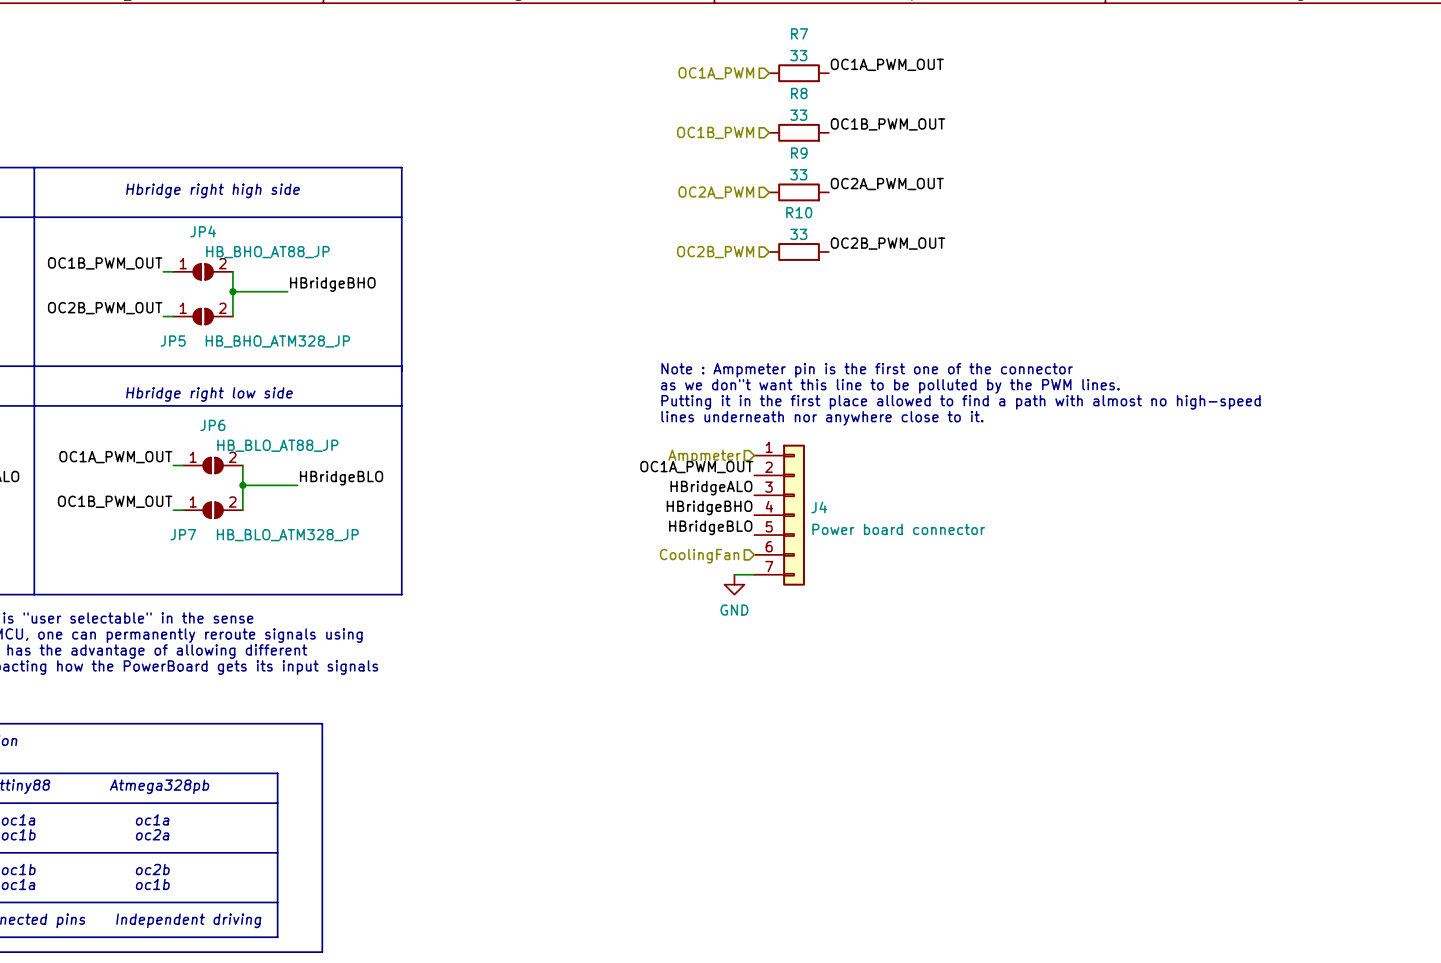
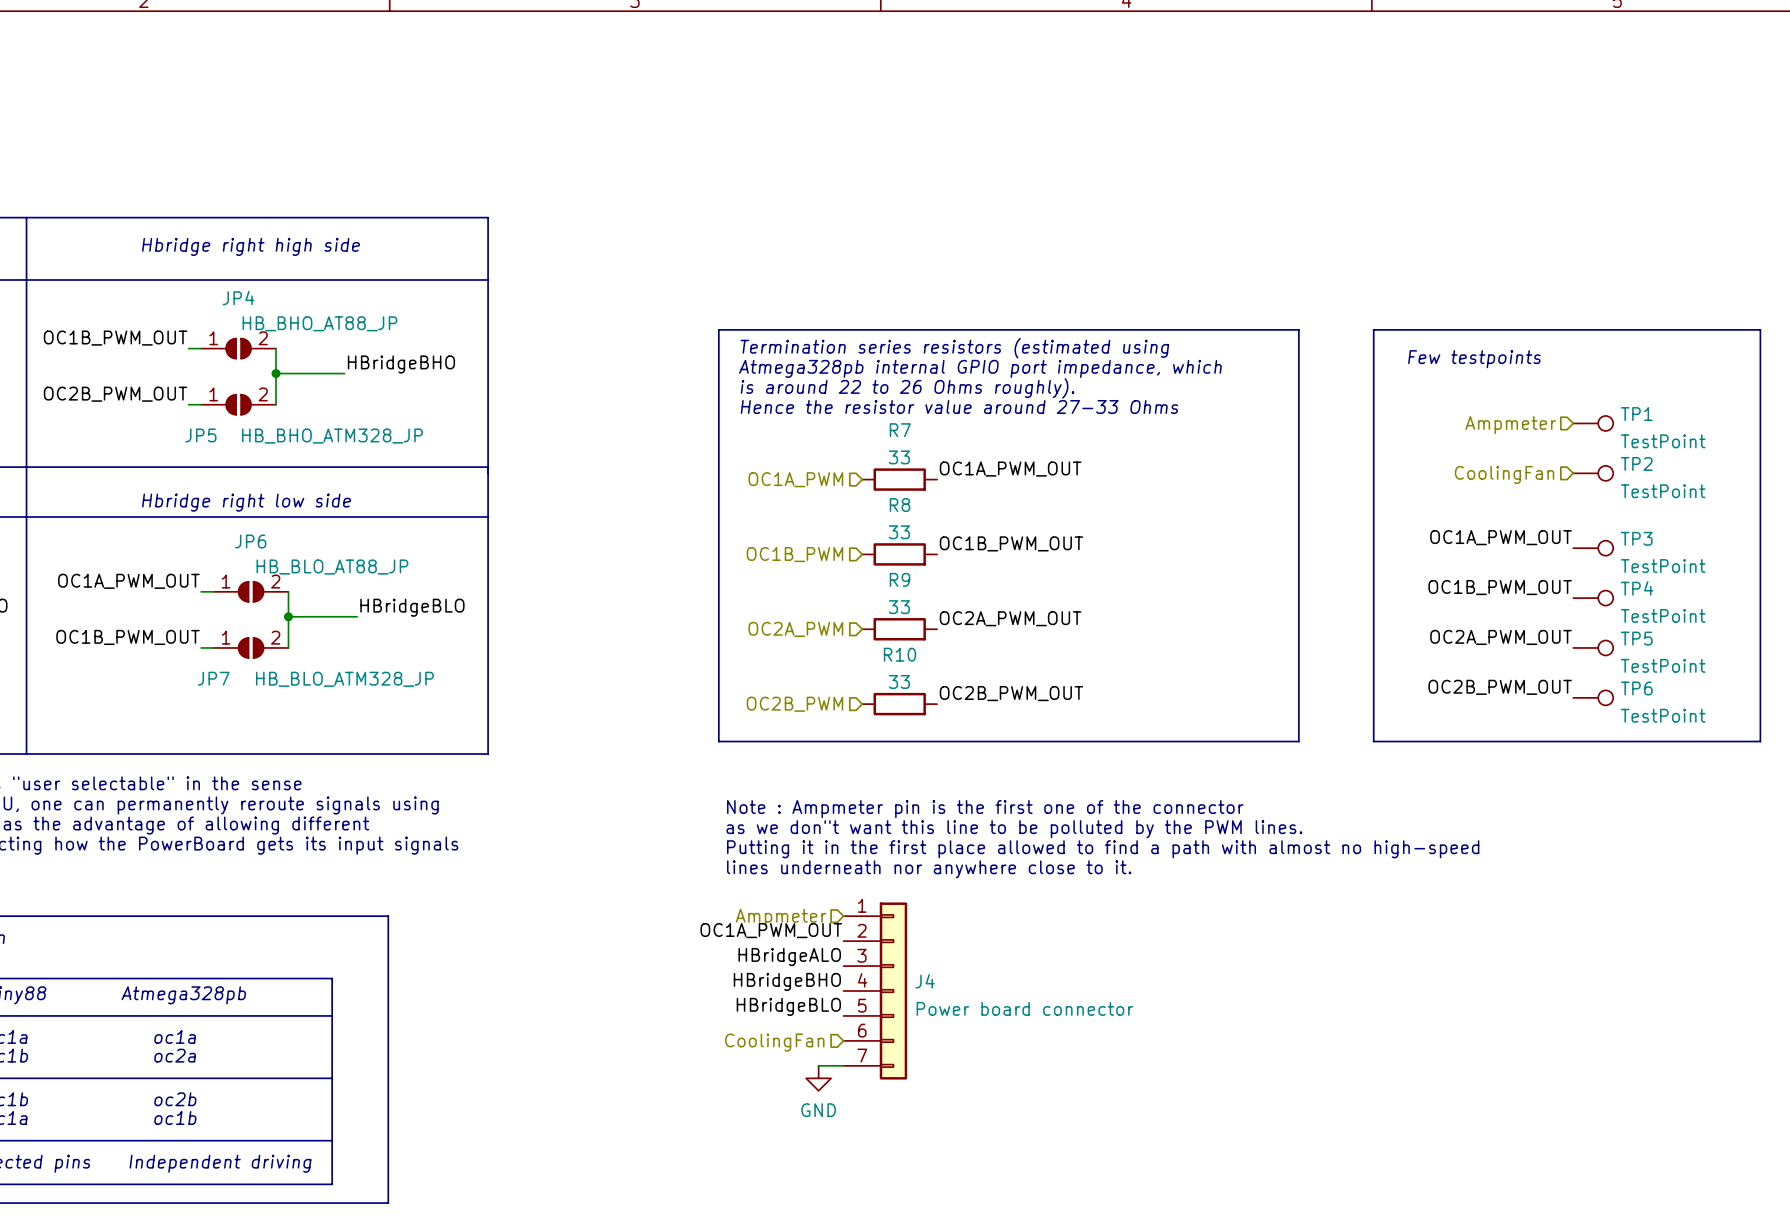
label: OC1A_PWM_OUT (887, 64) -> none
hierarchical label: OC1A_PWM (716, 73) -> none
R7 position: (799, 73) -> (899, 479)
label: OC1B_PWM_OUT (888, 124) -> none
hierarchical label: OC1B_PWM (715, 132) -> none
R8 position: (799, 132) -> (899, 554)
label: OC2A_PWM_OUT (887, 184) -> none
hierarchical label: OC2A_PWM (716, 192) -> none
R9 position: (799, 192) -> (899, 629)
label: OC2B_PWM_OUT (888, 243) -> none
R10 position: (799, 251) -> (899, 704)
hierarchical label: OC2B_PWM (715, 252) -> none
line: none -> (718, 329) (718, 741) (1298, 741) (1298, 329) (718, 329)
line: none -> (1373, 329) (1373, 741) (1760, 741) (1760, 329) (1373, 329)
text: none -> Termination series resistors (estimated using (954, 348)
text: none -> Few testpoints (1474, 359)
text: none -> Atmega328pb internal GPIO port impedance, which (980, 368)
text: none -> is around 22 to 26 Ohms roughly). (907, 388)
text: none -> Hence the resistor value around 27-33 Ohms (959, 406)
TP1: none -> TestPoint (1593, 423)
hierarchical label: none -> Ampmeter (1510, 425)
text: Note : Ampmeter pin is the first one of the connector (867, 370) -> none
TP2: none -> TestPoint (1593, 473)
hierarchical label: none -> CoolingFan (1504, 474)
hierarchical label: none -> OC1A_PWM (795, 479)
text: as we don"t want this line to be polluted by the PWM lines. (890, 386) -> none
text: Putting it in the first place allowed to find a path with almost no high-speed (961, 402) -> none
text: lines underneath nor anywhere close to it. (822, 418) -> none
label: none -> OC1A_PWM_OUT (1501, 537)
label: none -> OC1B_PWM_OUT (1011, 543)
TP3: none -> TestPoint (1593, 548)
hierarchical label: none -> OC1B_PWM (794, 554)
hierarchical label: Ampmeter (704, 456) -> none
label: none -> OC1B_PWM_OUT (1500, 587)
label position: OC1A_PWM_OUT (696, 467) -> OC1A_PWM_OUT (1010, 469)
TP4: none -> TestPoint (1593, 598)
label: HBridgeALO (711, 488) -> OC2A_PWM_OUT (1010, 618)
hierarchical label: none -> OC2A_PWM (795, 629)
label: none -> OC2A_PWM_OUT (1501, 637)
label: HBridgeBHO (709, 507) -> none
TP5: none -> TestPoint (1593, 647)
J4 position: (779, 515) -> (875, 991)
label: HBridgeBLO (710, 527) -> none
label: none -> OC2B_PWM_OUT (1500, 687)
label: none -> OC2B_PWM_OUT (1011, 693)
TP6: none -> TestPoint (1593, 697)
hierarchical label: none -> OC2B_PWM (794, 704)
hierarchical label: CoolingFan (699, 556) -> none
wire: (734, 574) (754, 574) -> none
power symbol: GND (734, 584) -> none
text: none -> Note : Ampmeter pin is the first one of the connector (985, 809)
text: none -> as we don"t want this line to be polluted by the PWM lines. (1014, 829)
text: none -> Putting it in the first place allowed to find a path with almost no high-speed (1103, 849)
text: none -> lines underneath nor anywhere close to it. (929, 869)
hierarchical label: none -> Ampmeter (781, 917)
label: none -> OC1A_PWM_OUT (771, 930)
label: none -> HBridgeALO (789, 957)
label: none -> HBridgeBHO (787, 981)
label: none -> HBridgeBLO (788, 1006)
hierarchical label: none -> CoolingFan (774, 1042)
wire: none -> (818, 1065) (843, 1065)
power symbol: none -> GND (818, 1078)

